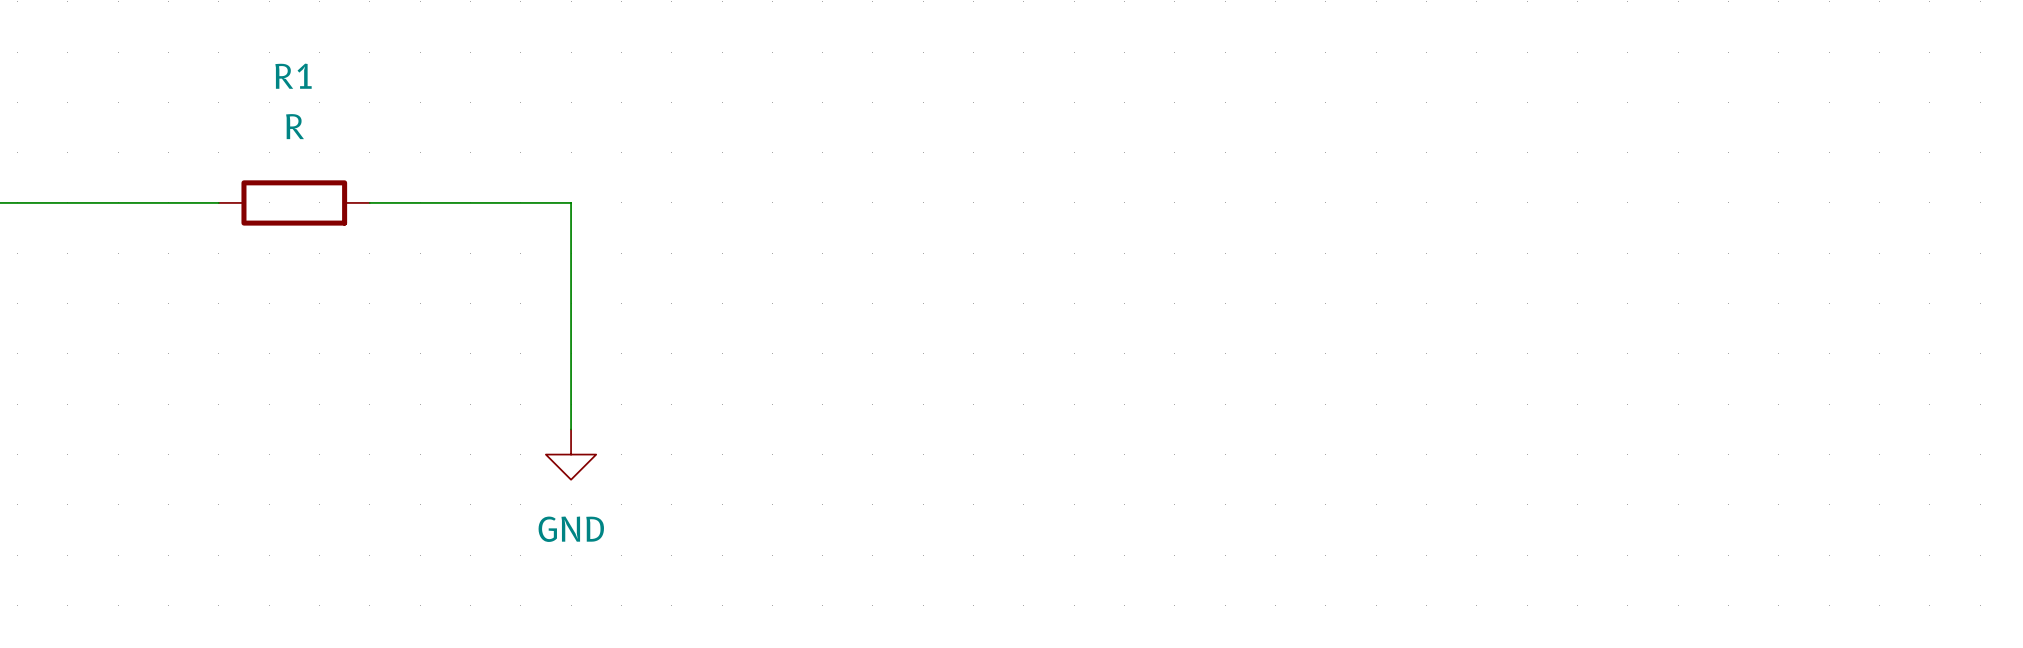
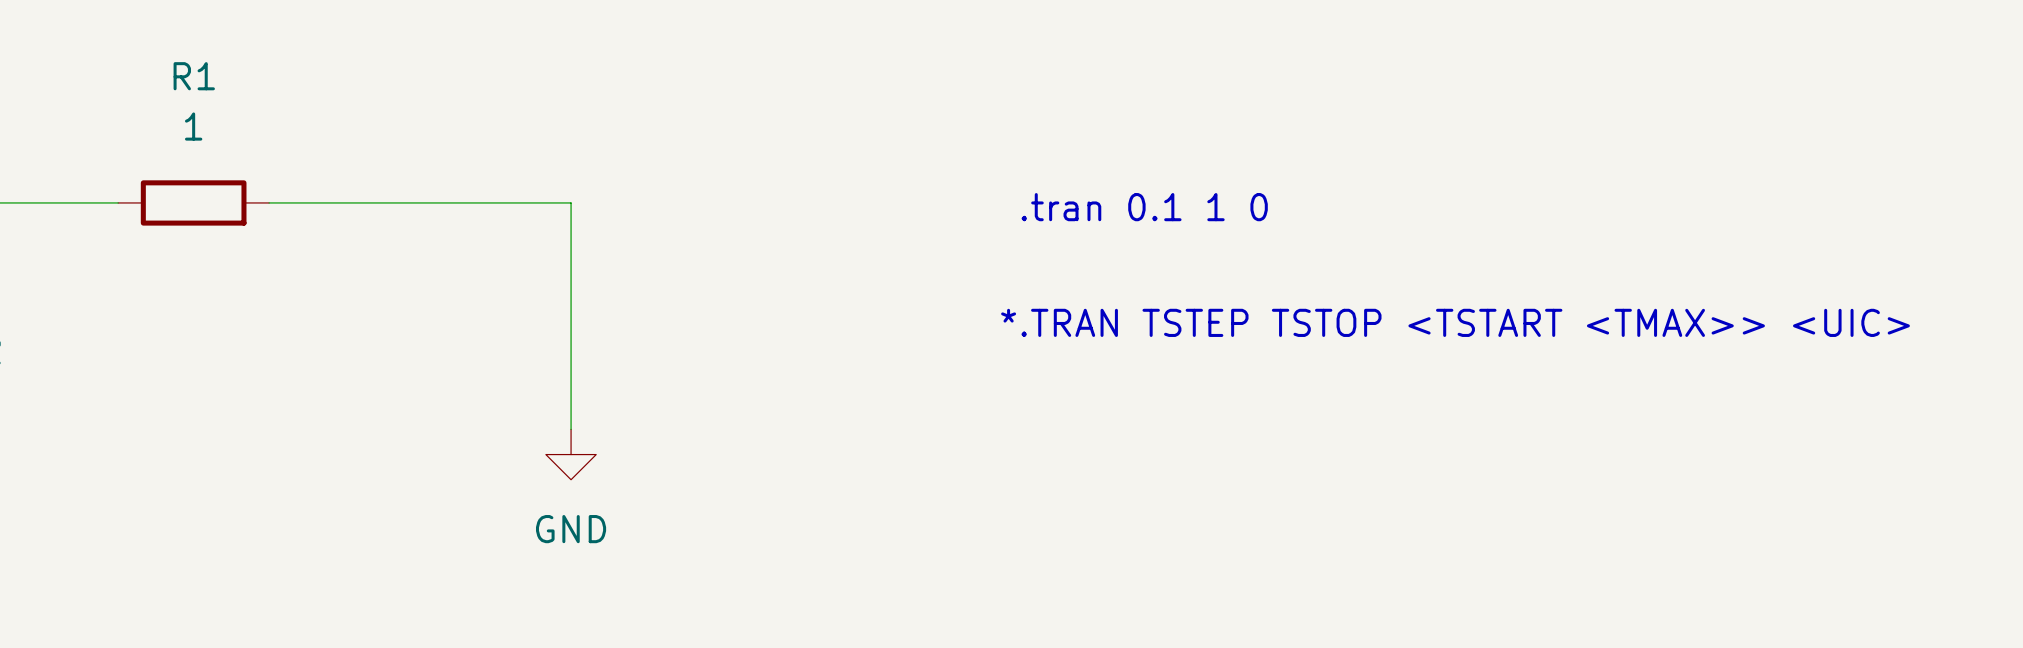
R1 value: R (295, 126) -> 1 (193, 126)
wire: (118, 202) (218, 202) -> (269, 202) (369, 202)
R1 position: (294, 202) -> (193, 202)
text: none -> .tran 0.1 1 0 (1144, 207)
text: none -> *.TRAN TSTEP TSTOP <TSTART <TMAX>> <UIC> (1455, 322)

